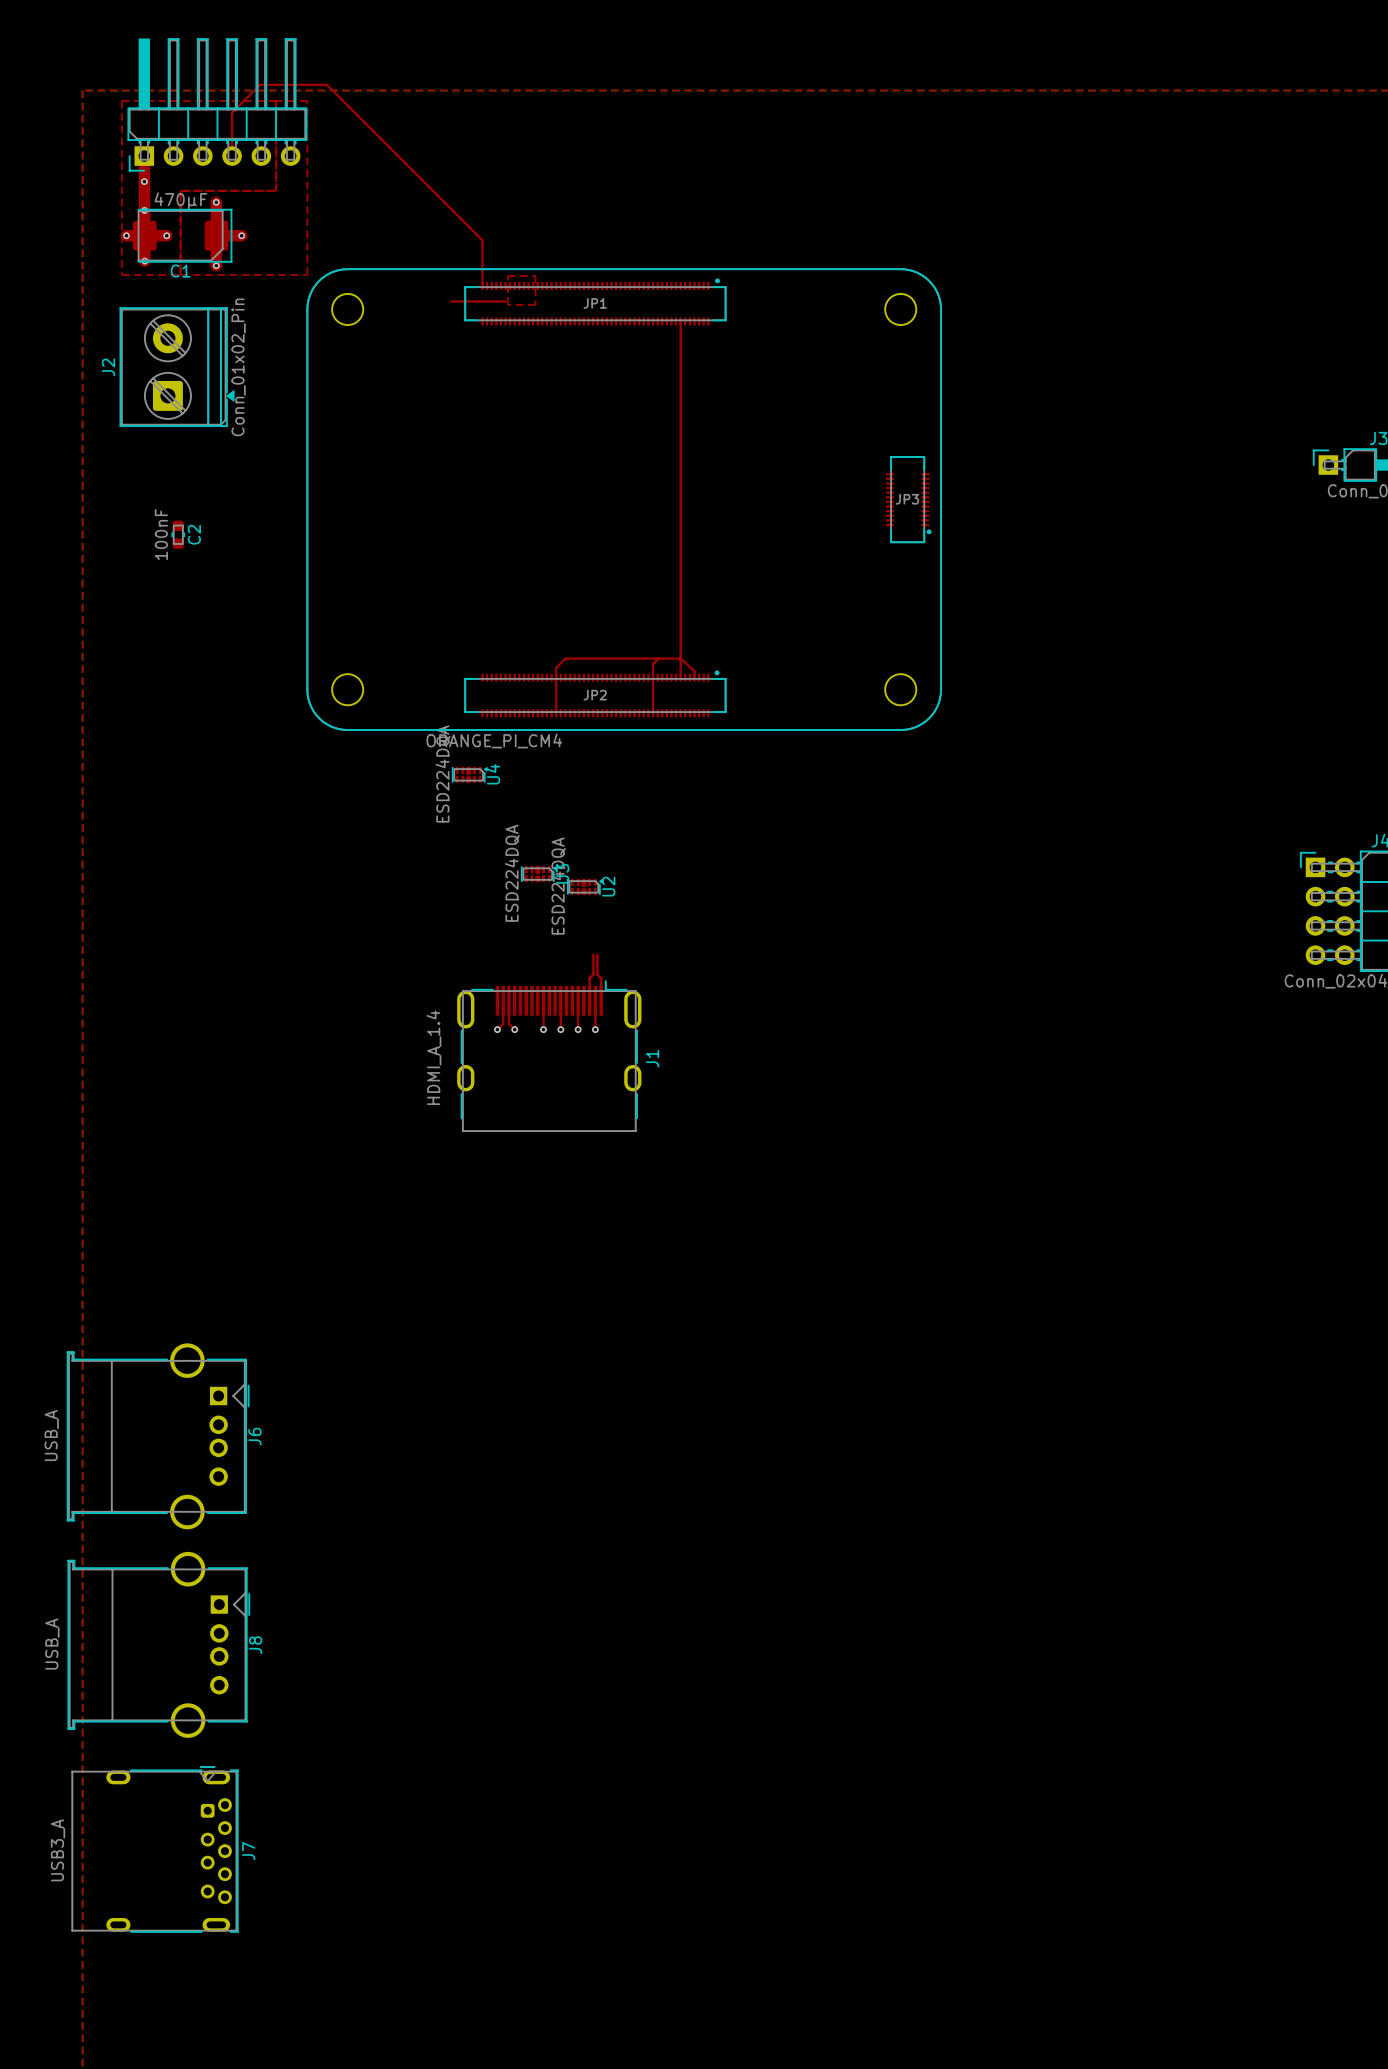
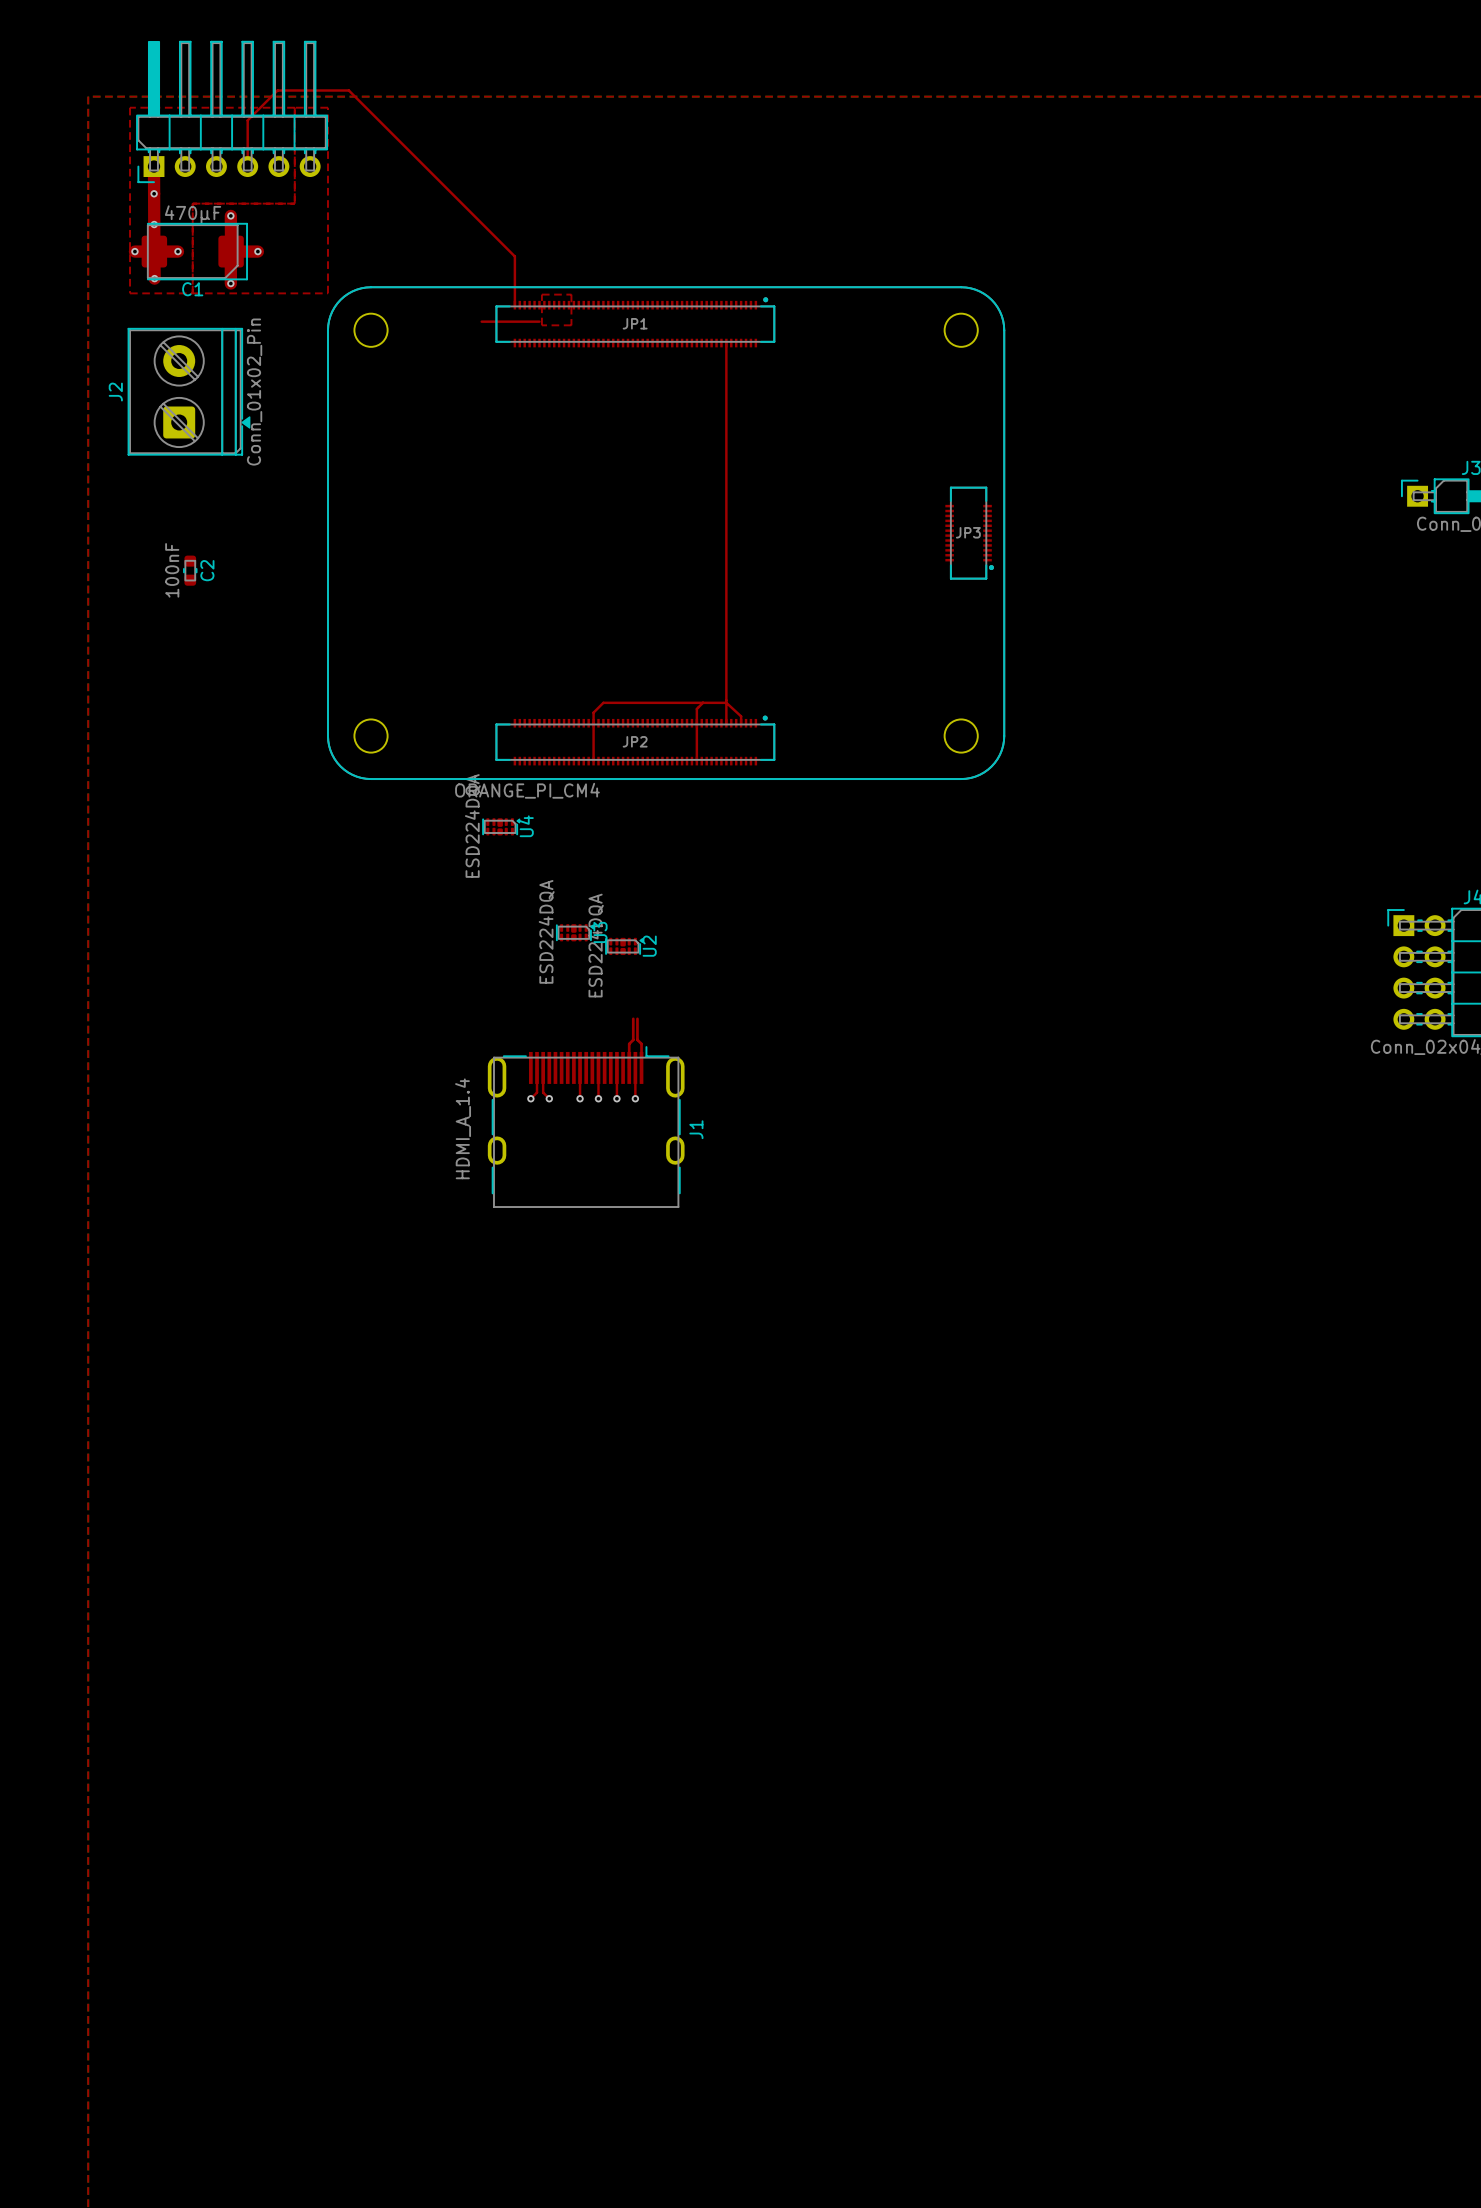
J6: USB_A (158, 1436) -> none
J8: USB_A (158, 1644) -> none
J7: USB3_A (155, 1849) -> none

